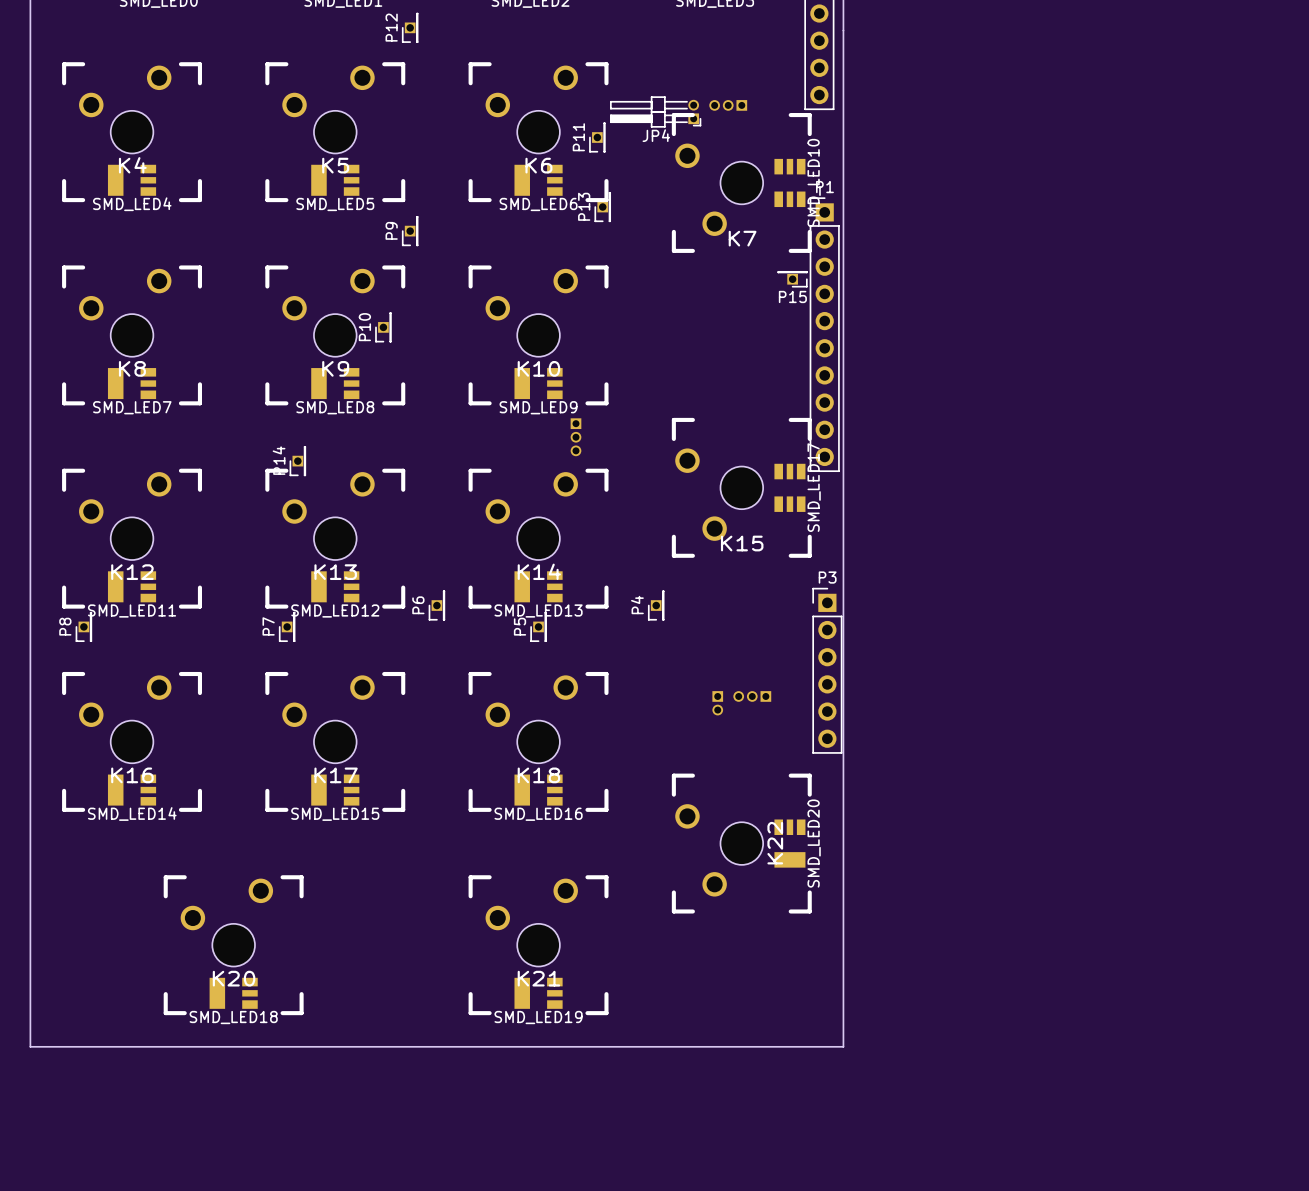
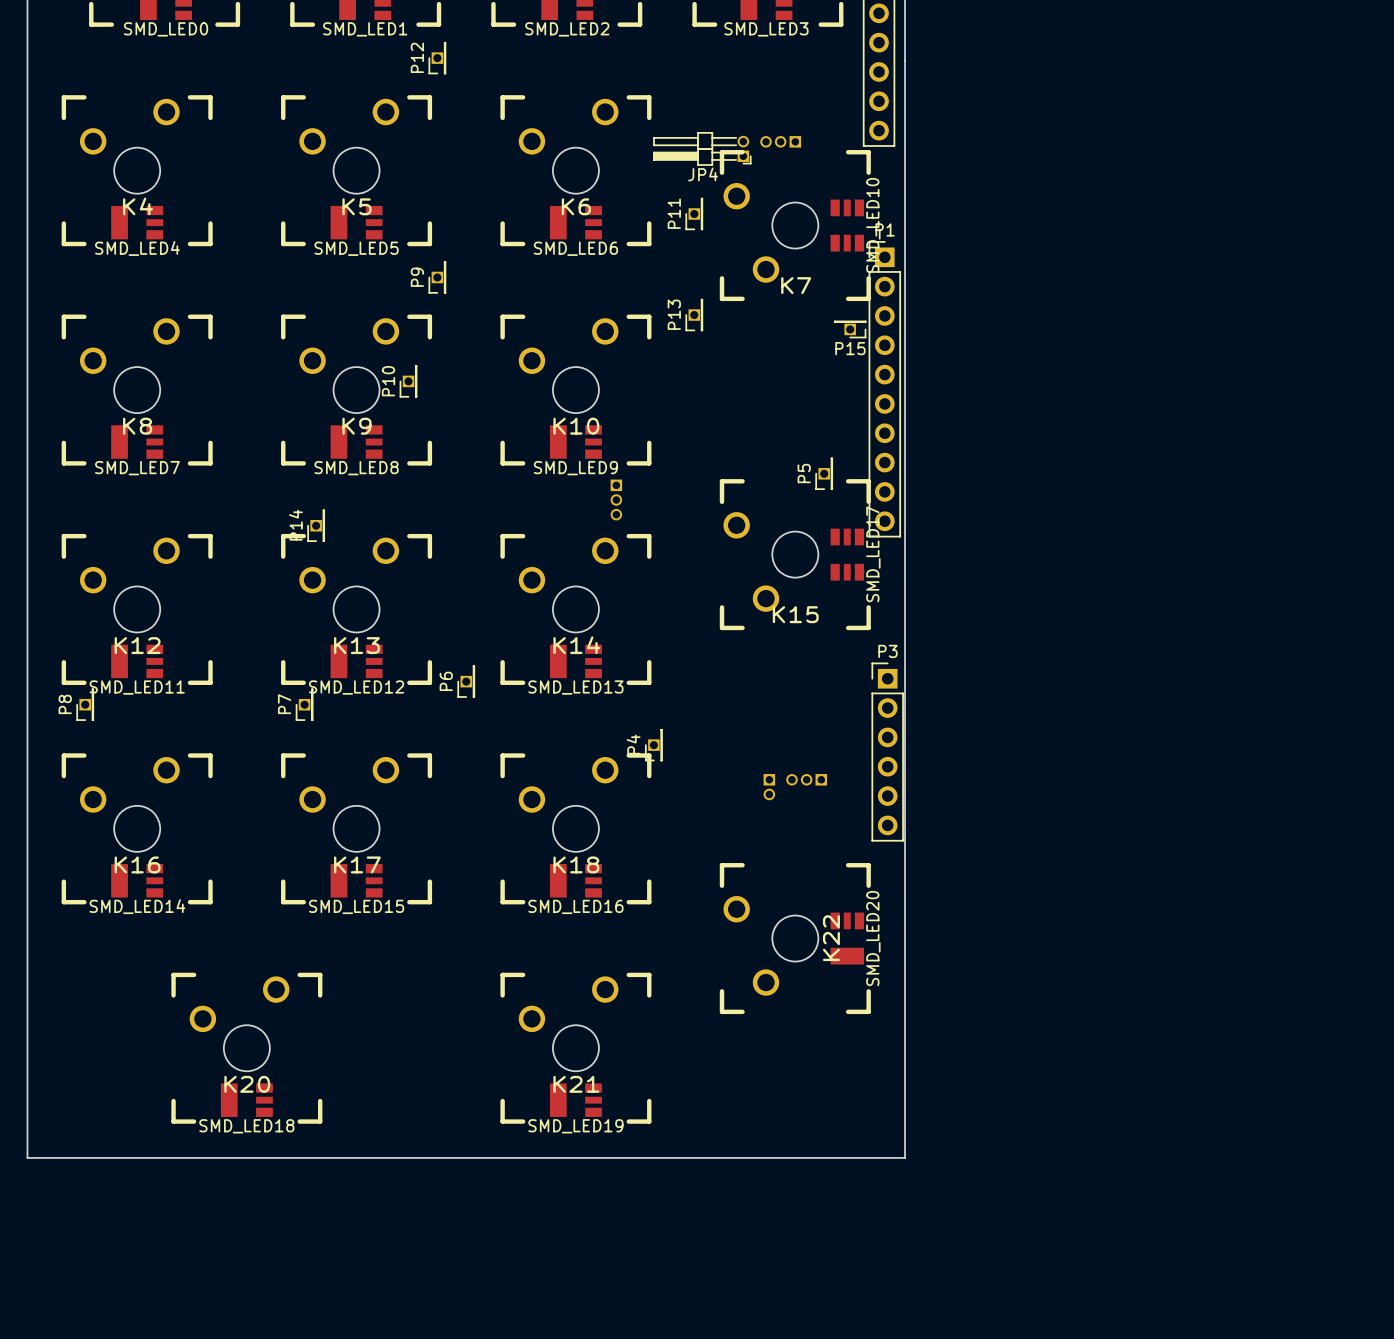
P11 position: (597, 137) -> (694, 213)
P13 position: (602, 207) -> (694, 315)
P4 position: (656, 605) -> (653, 745)
P5 position: (538, 626) -> (824, 473)

